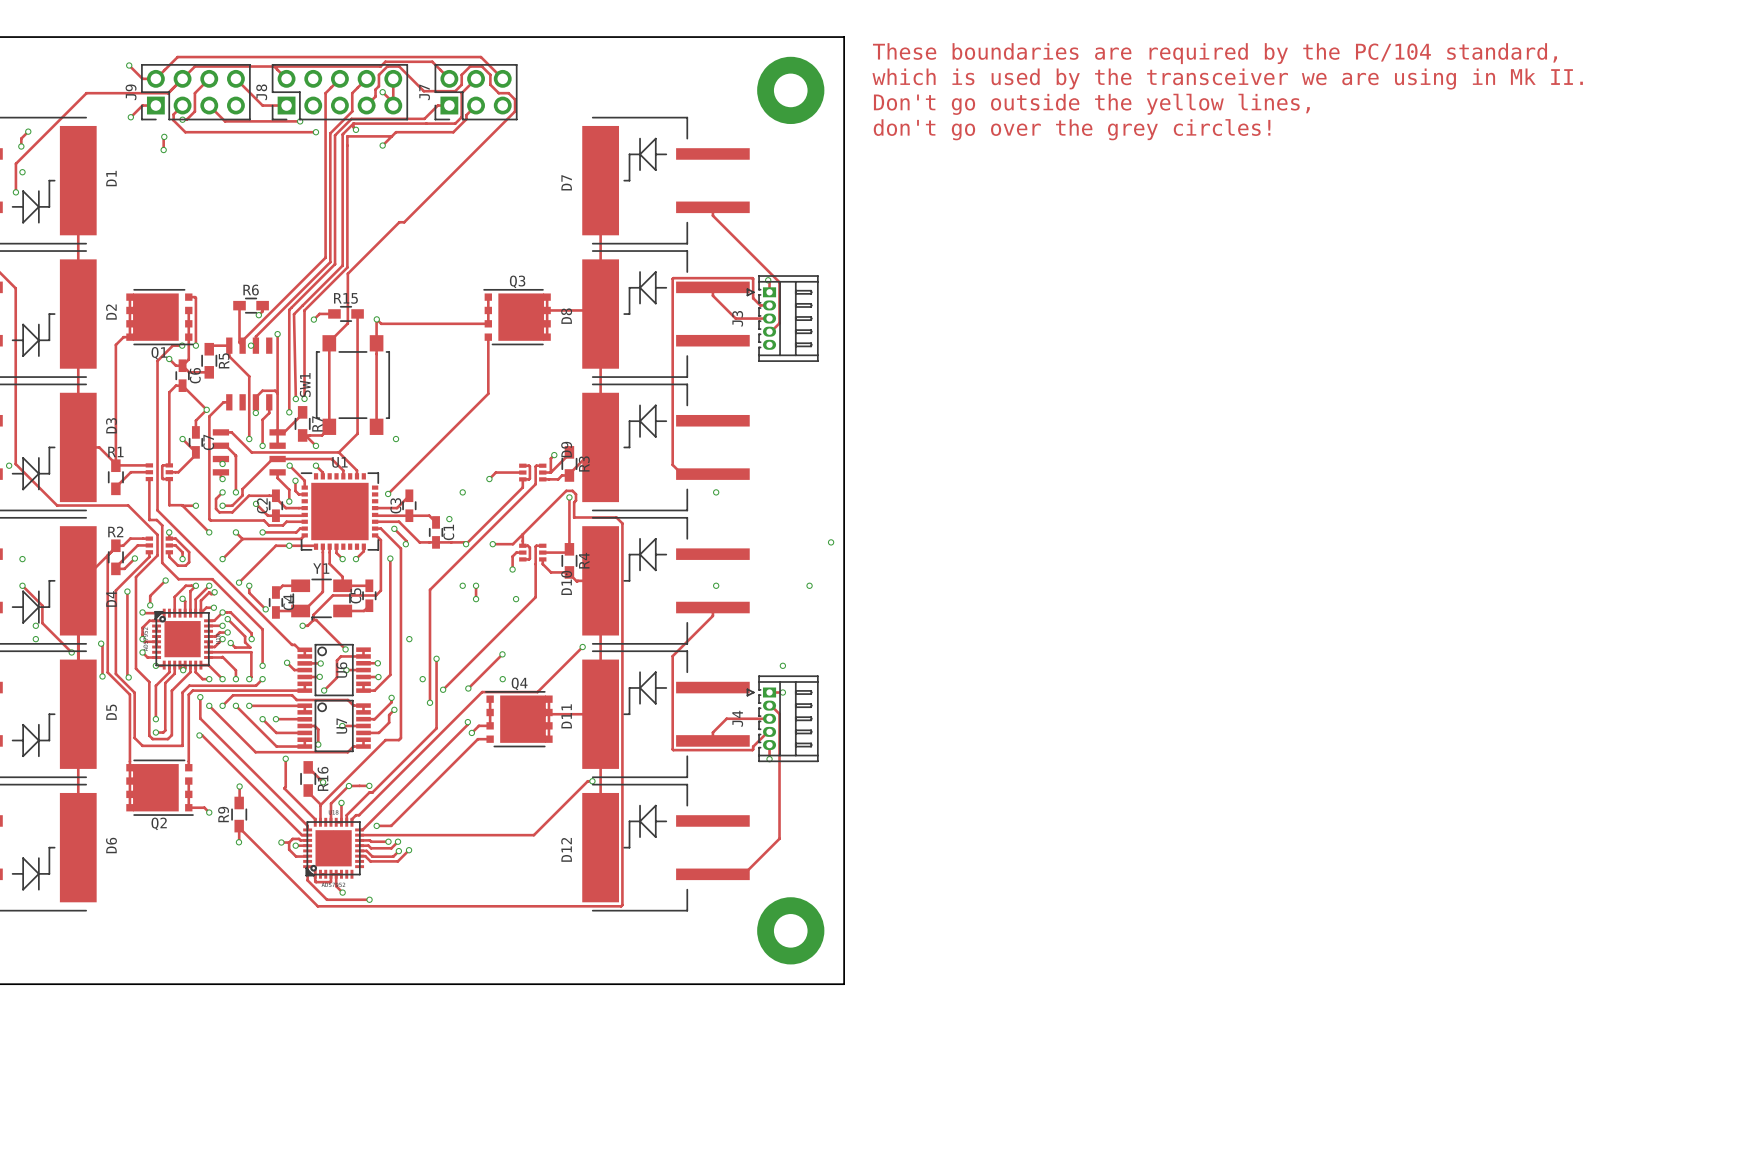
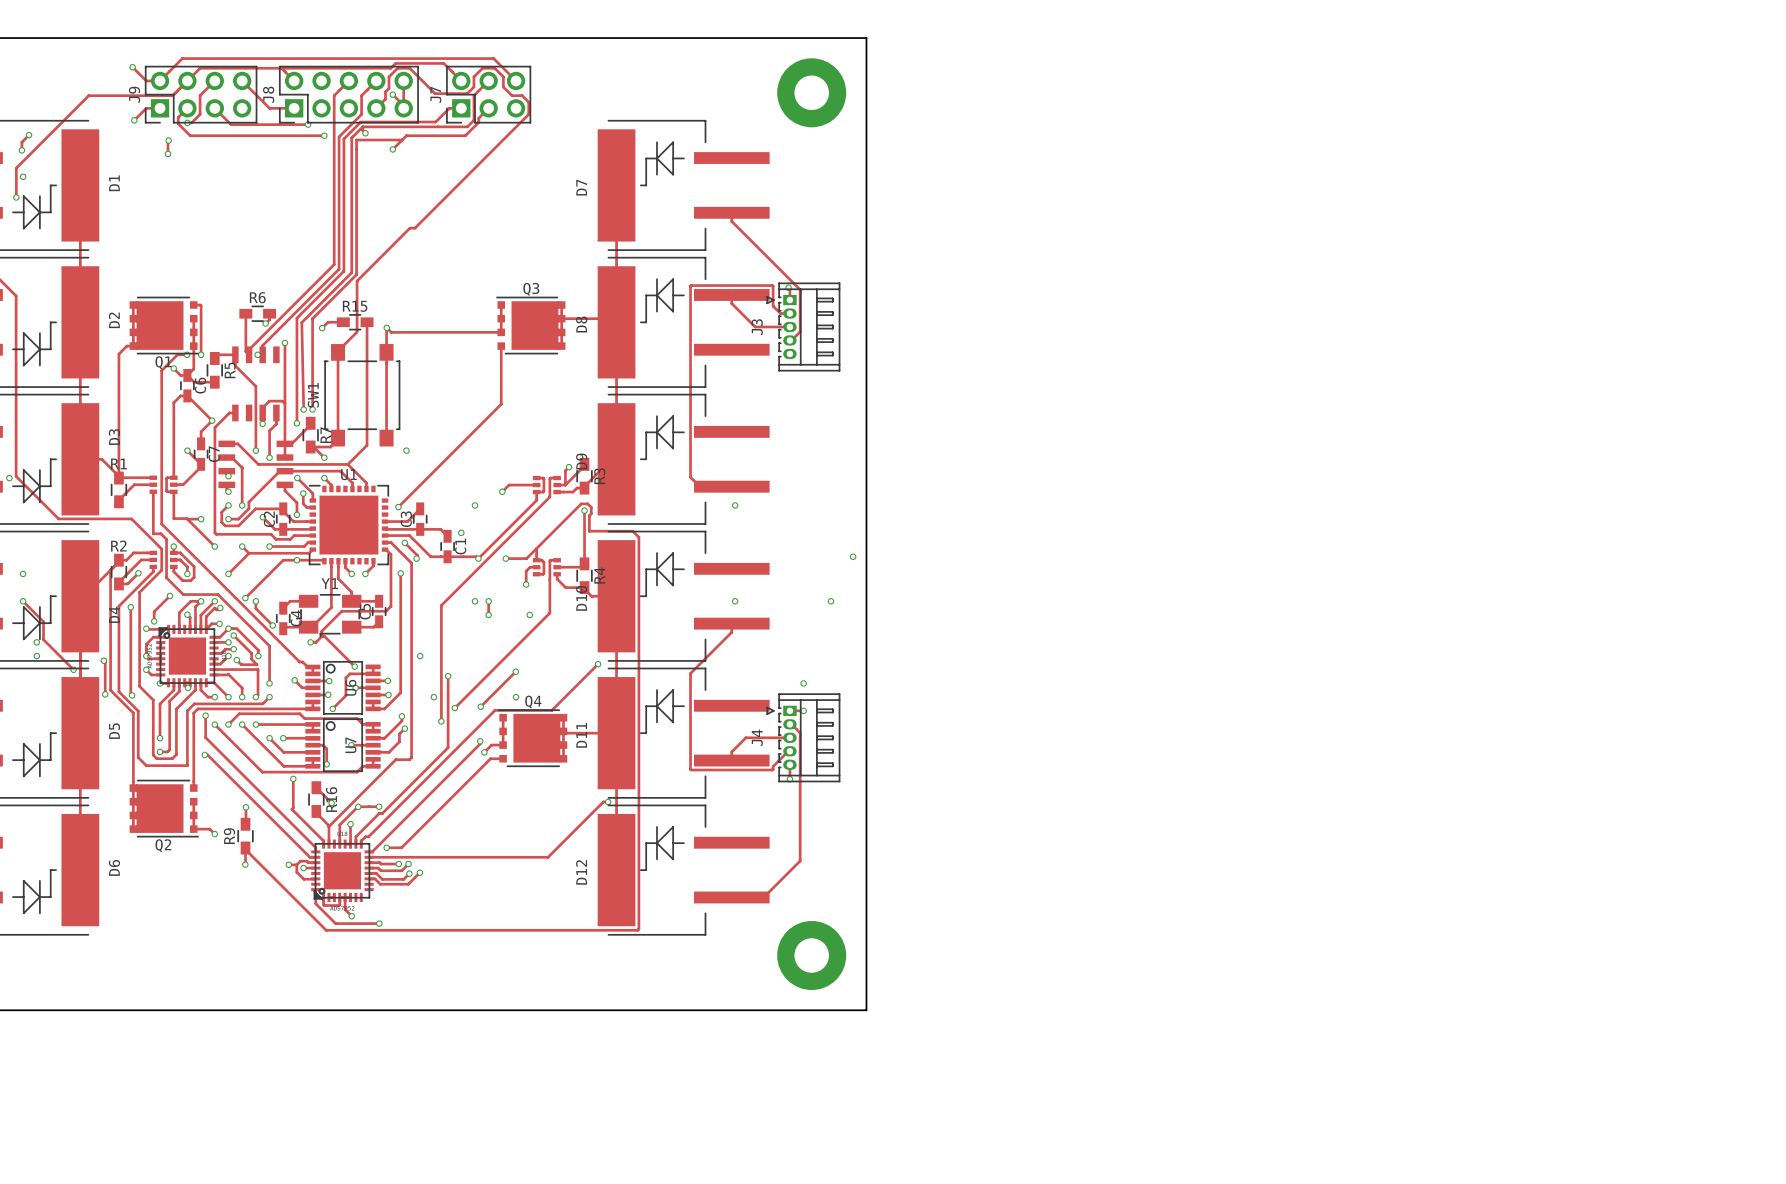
text: These boundaries are required by the PC/104 standard, (1214, 53) -> none
text: which is used by the transceiver we are using in Mk II. (1227, 79) -> none
text: Don't go outside the yellow lines, (1091, 104) -> none
text: don't go over the grey circles! (1072, 129) -> none

